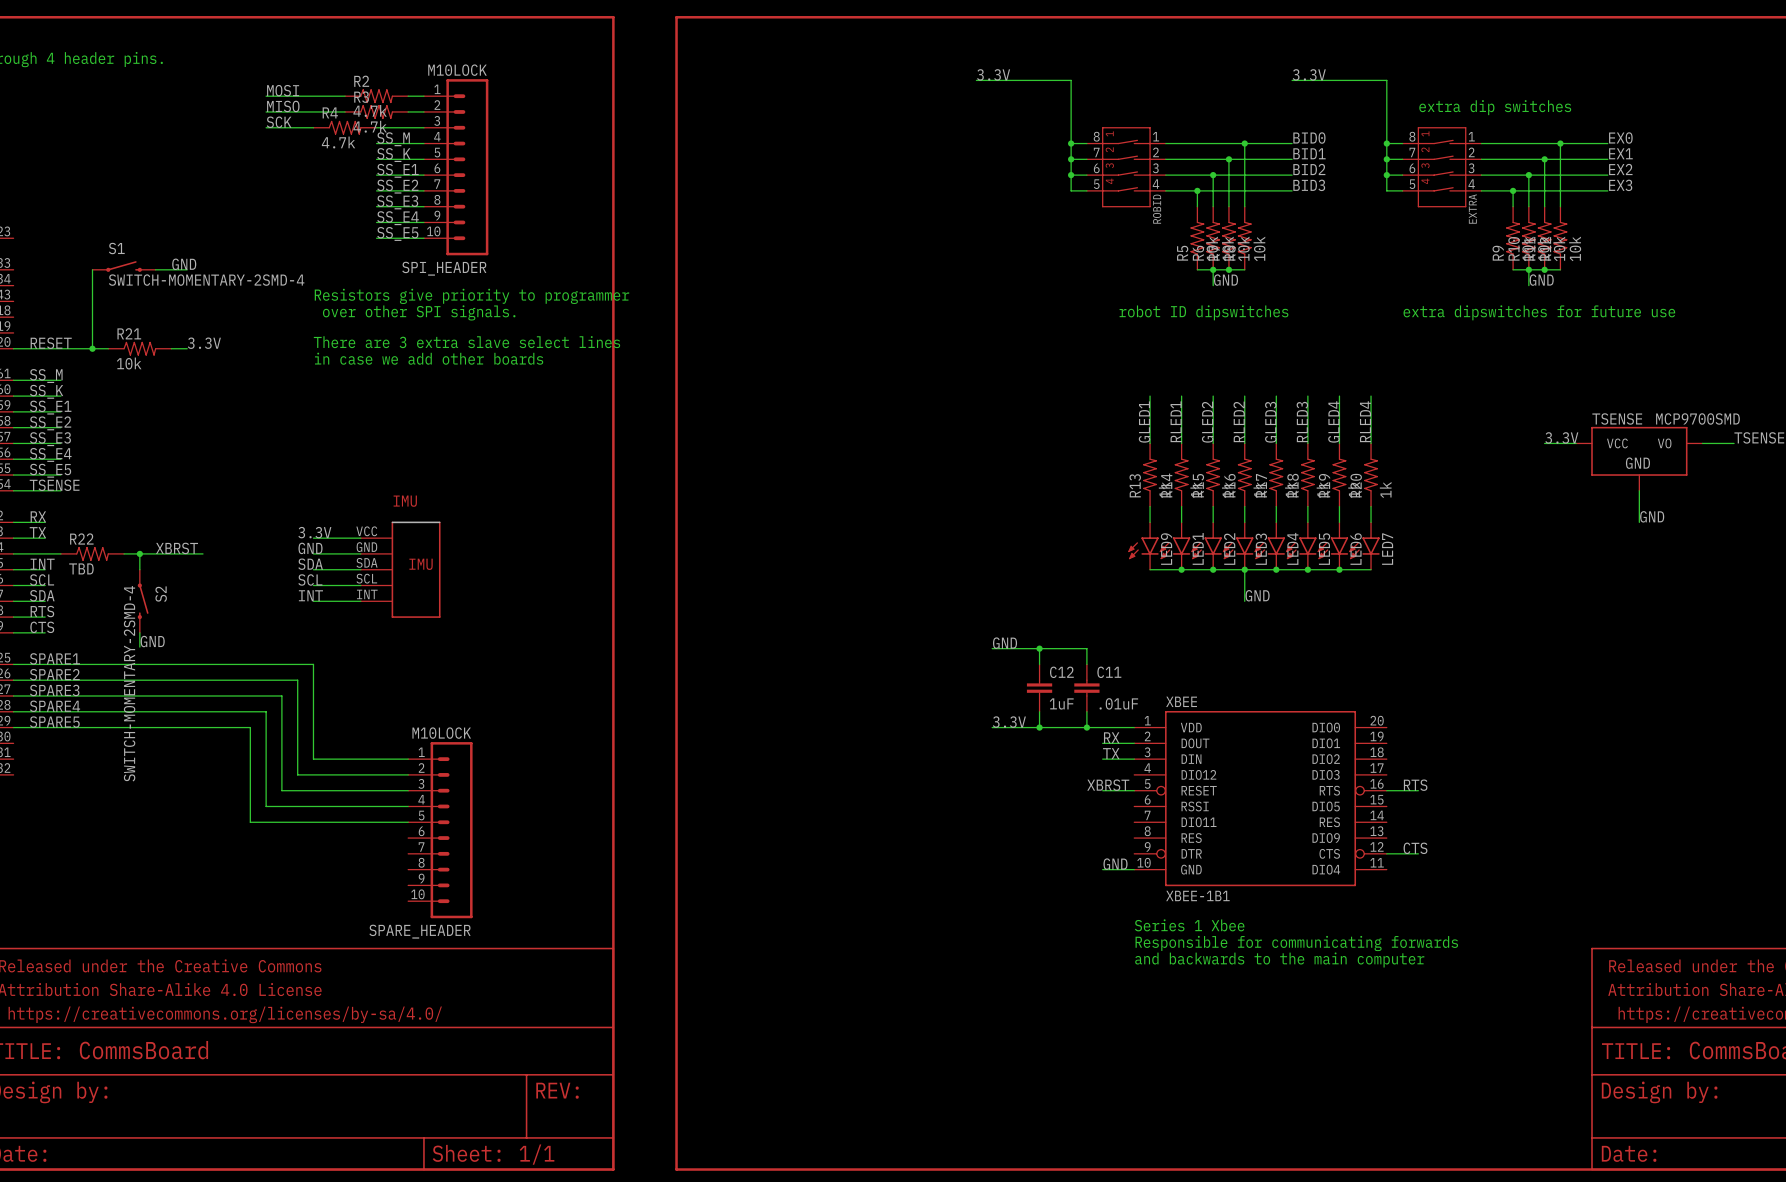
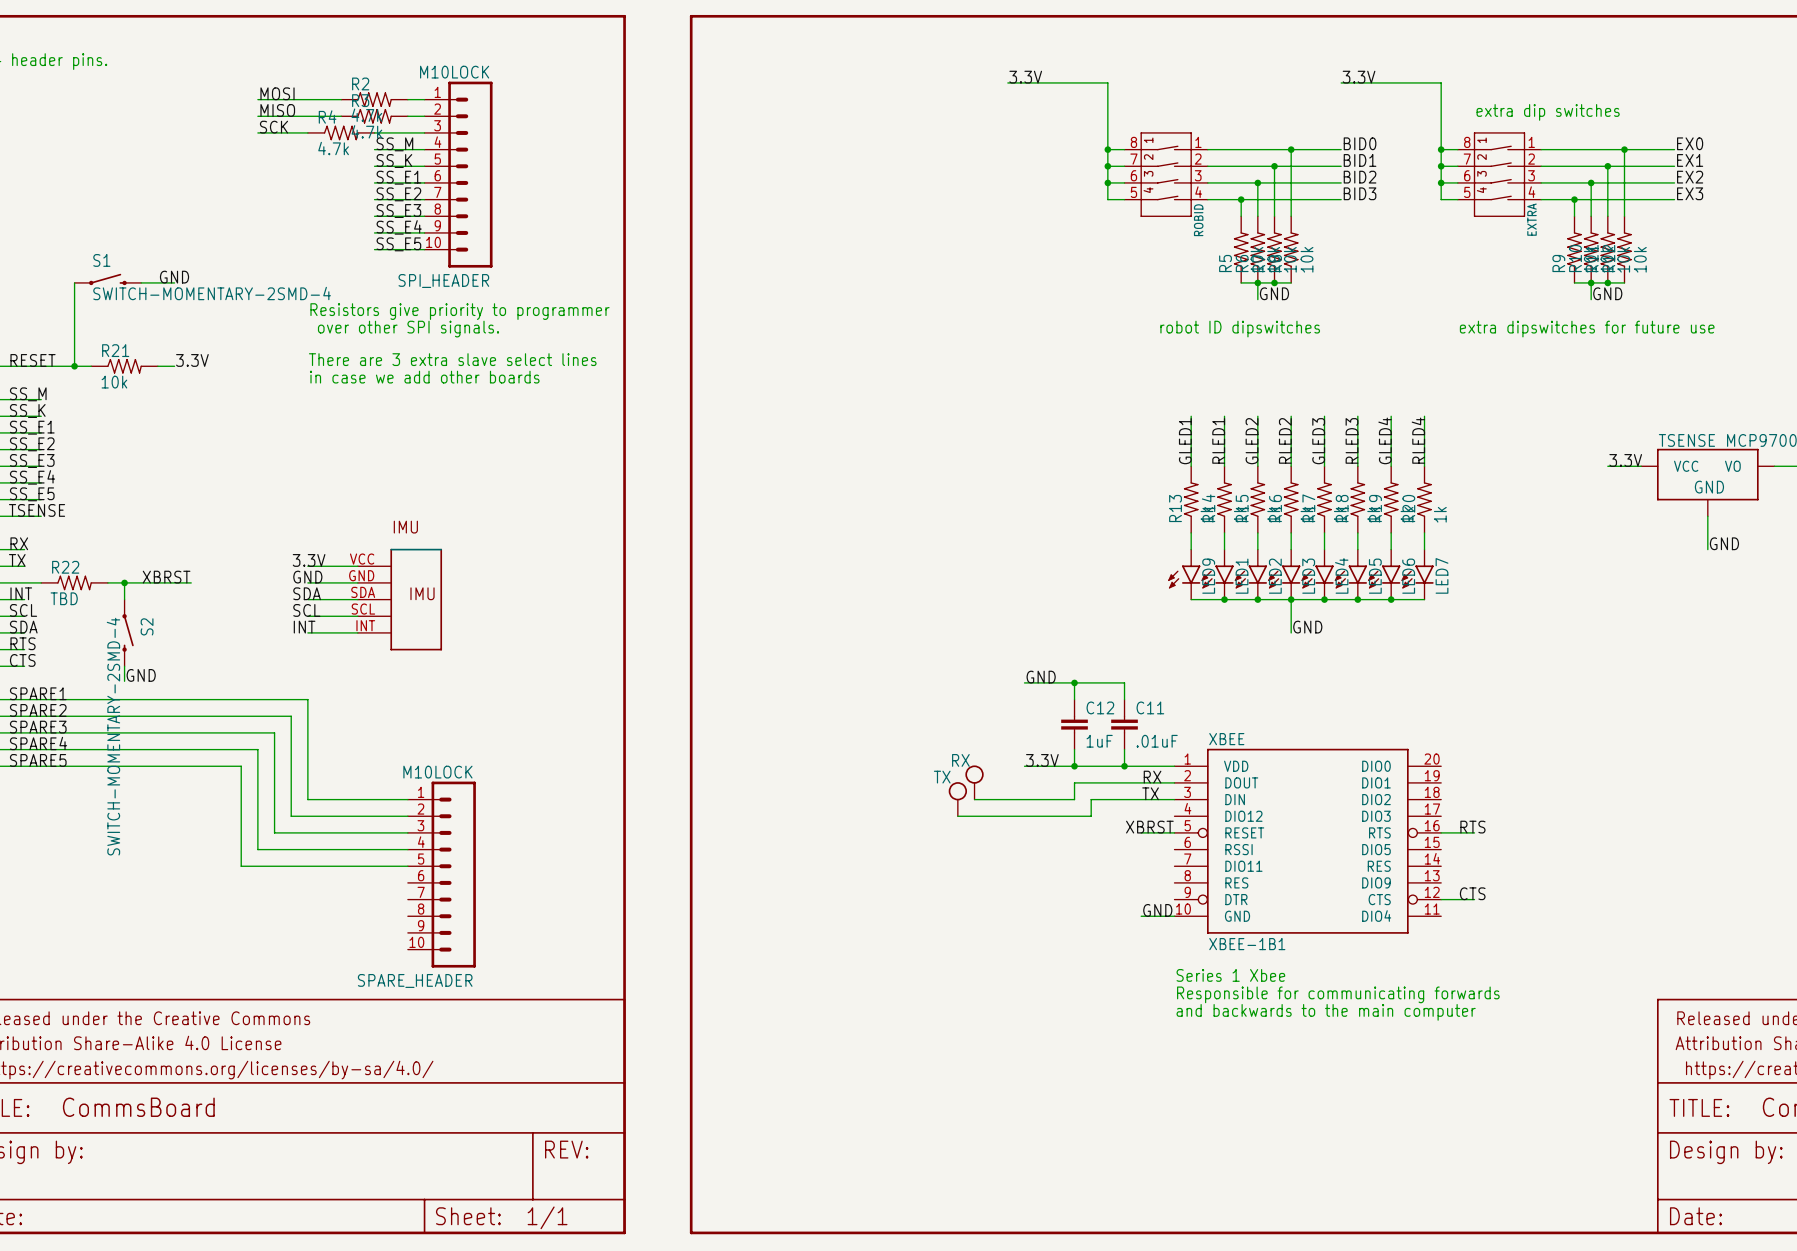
RX: none -> (974, 782)
wire: none -> (1141, 782) (1074, 782) (1074, 799) (974, 799)
TX: none -> (957, 799)
wire: none -> (1141, 799) (1091, 799) (1091, 816) (957, 816)

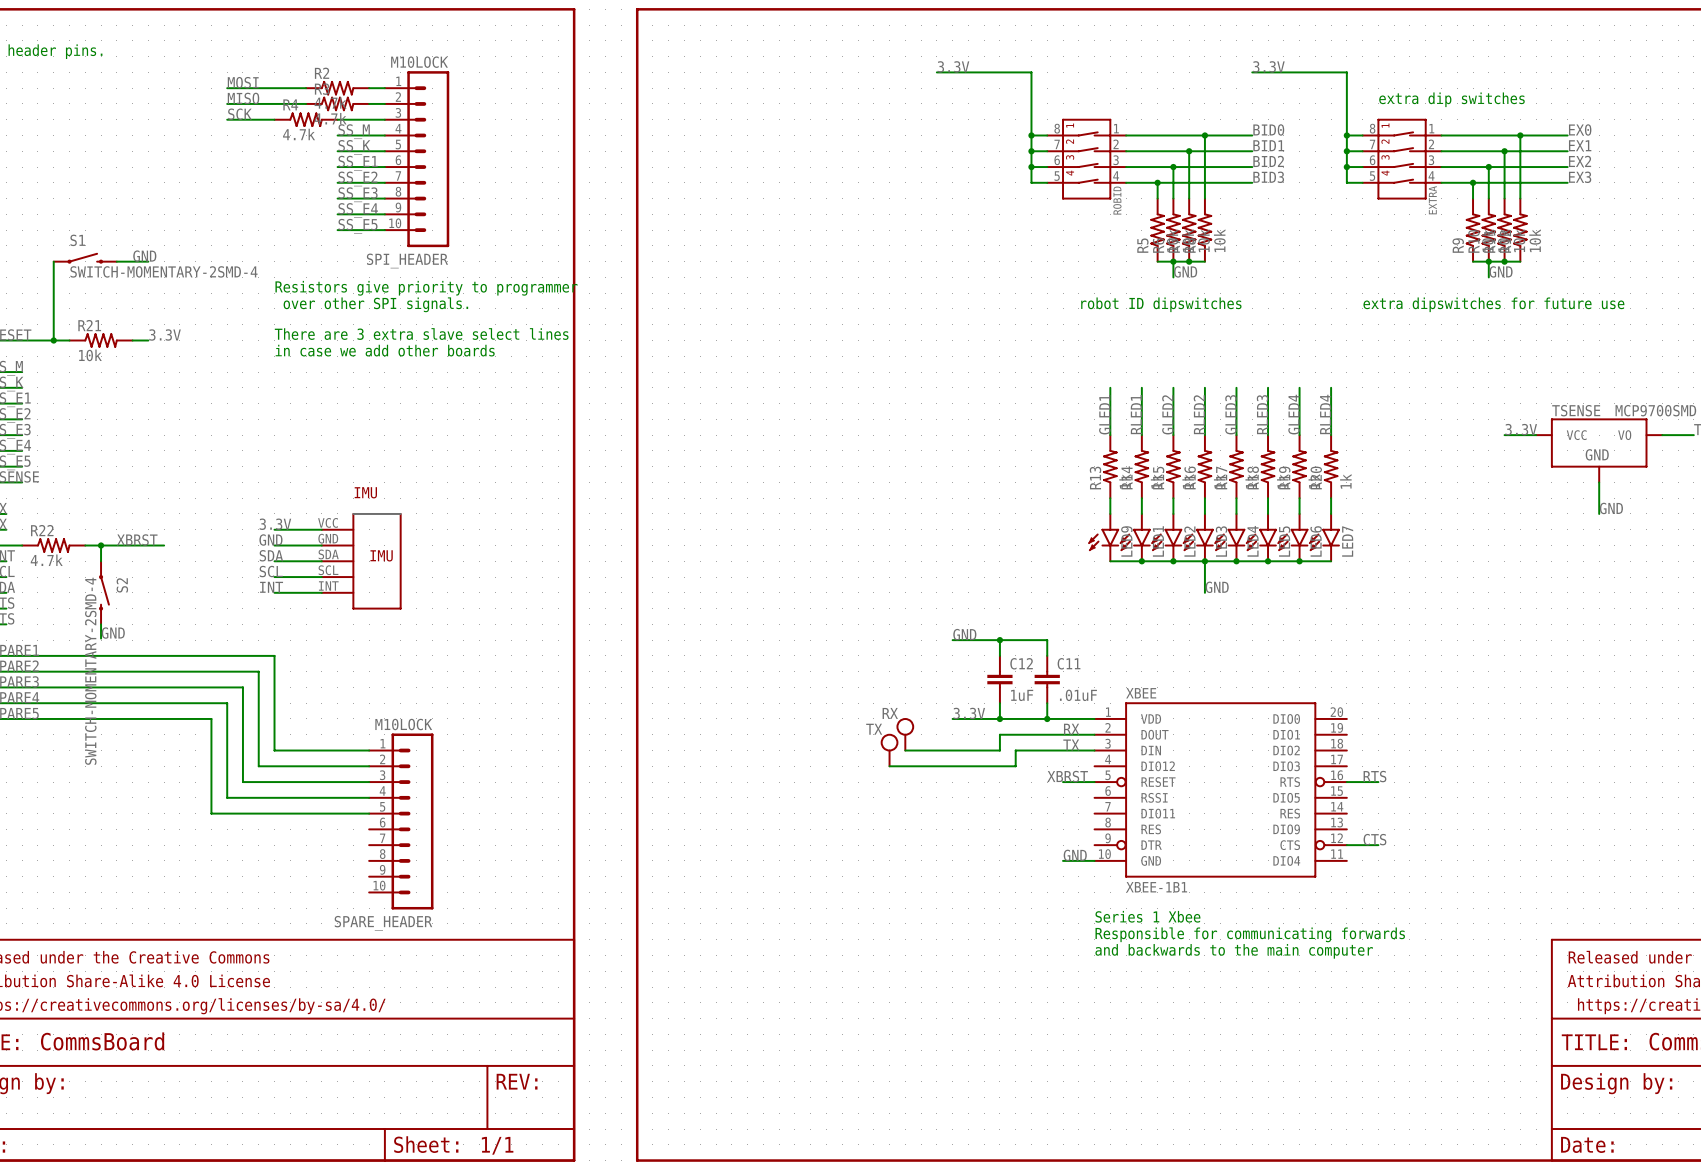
R22 value: TBD (64, 598) -> 4.7k (46, 560)

